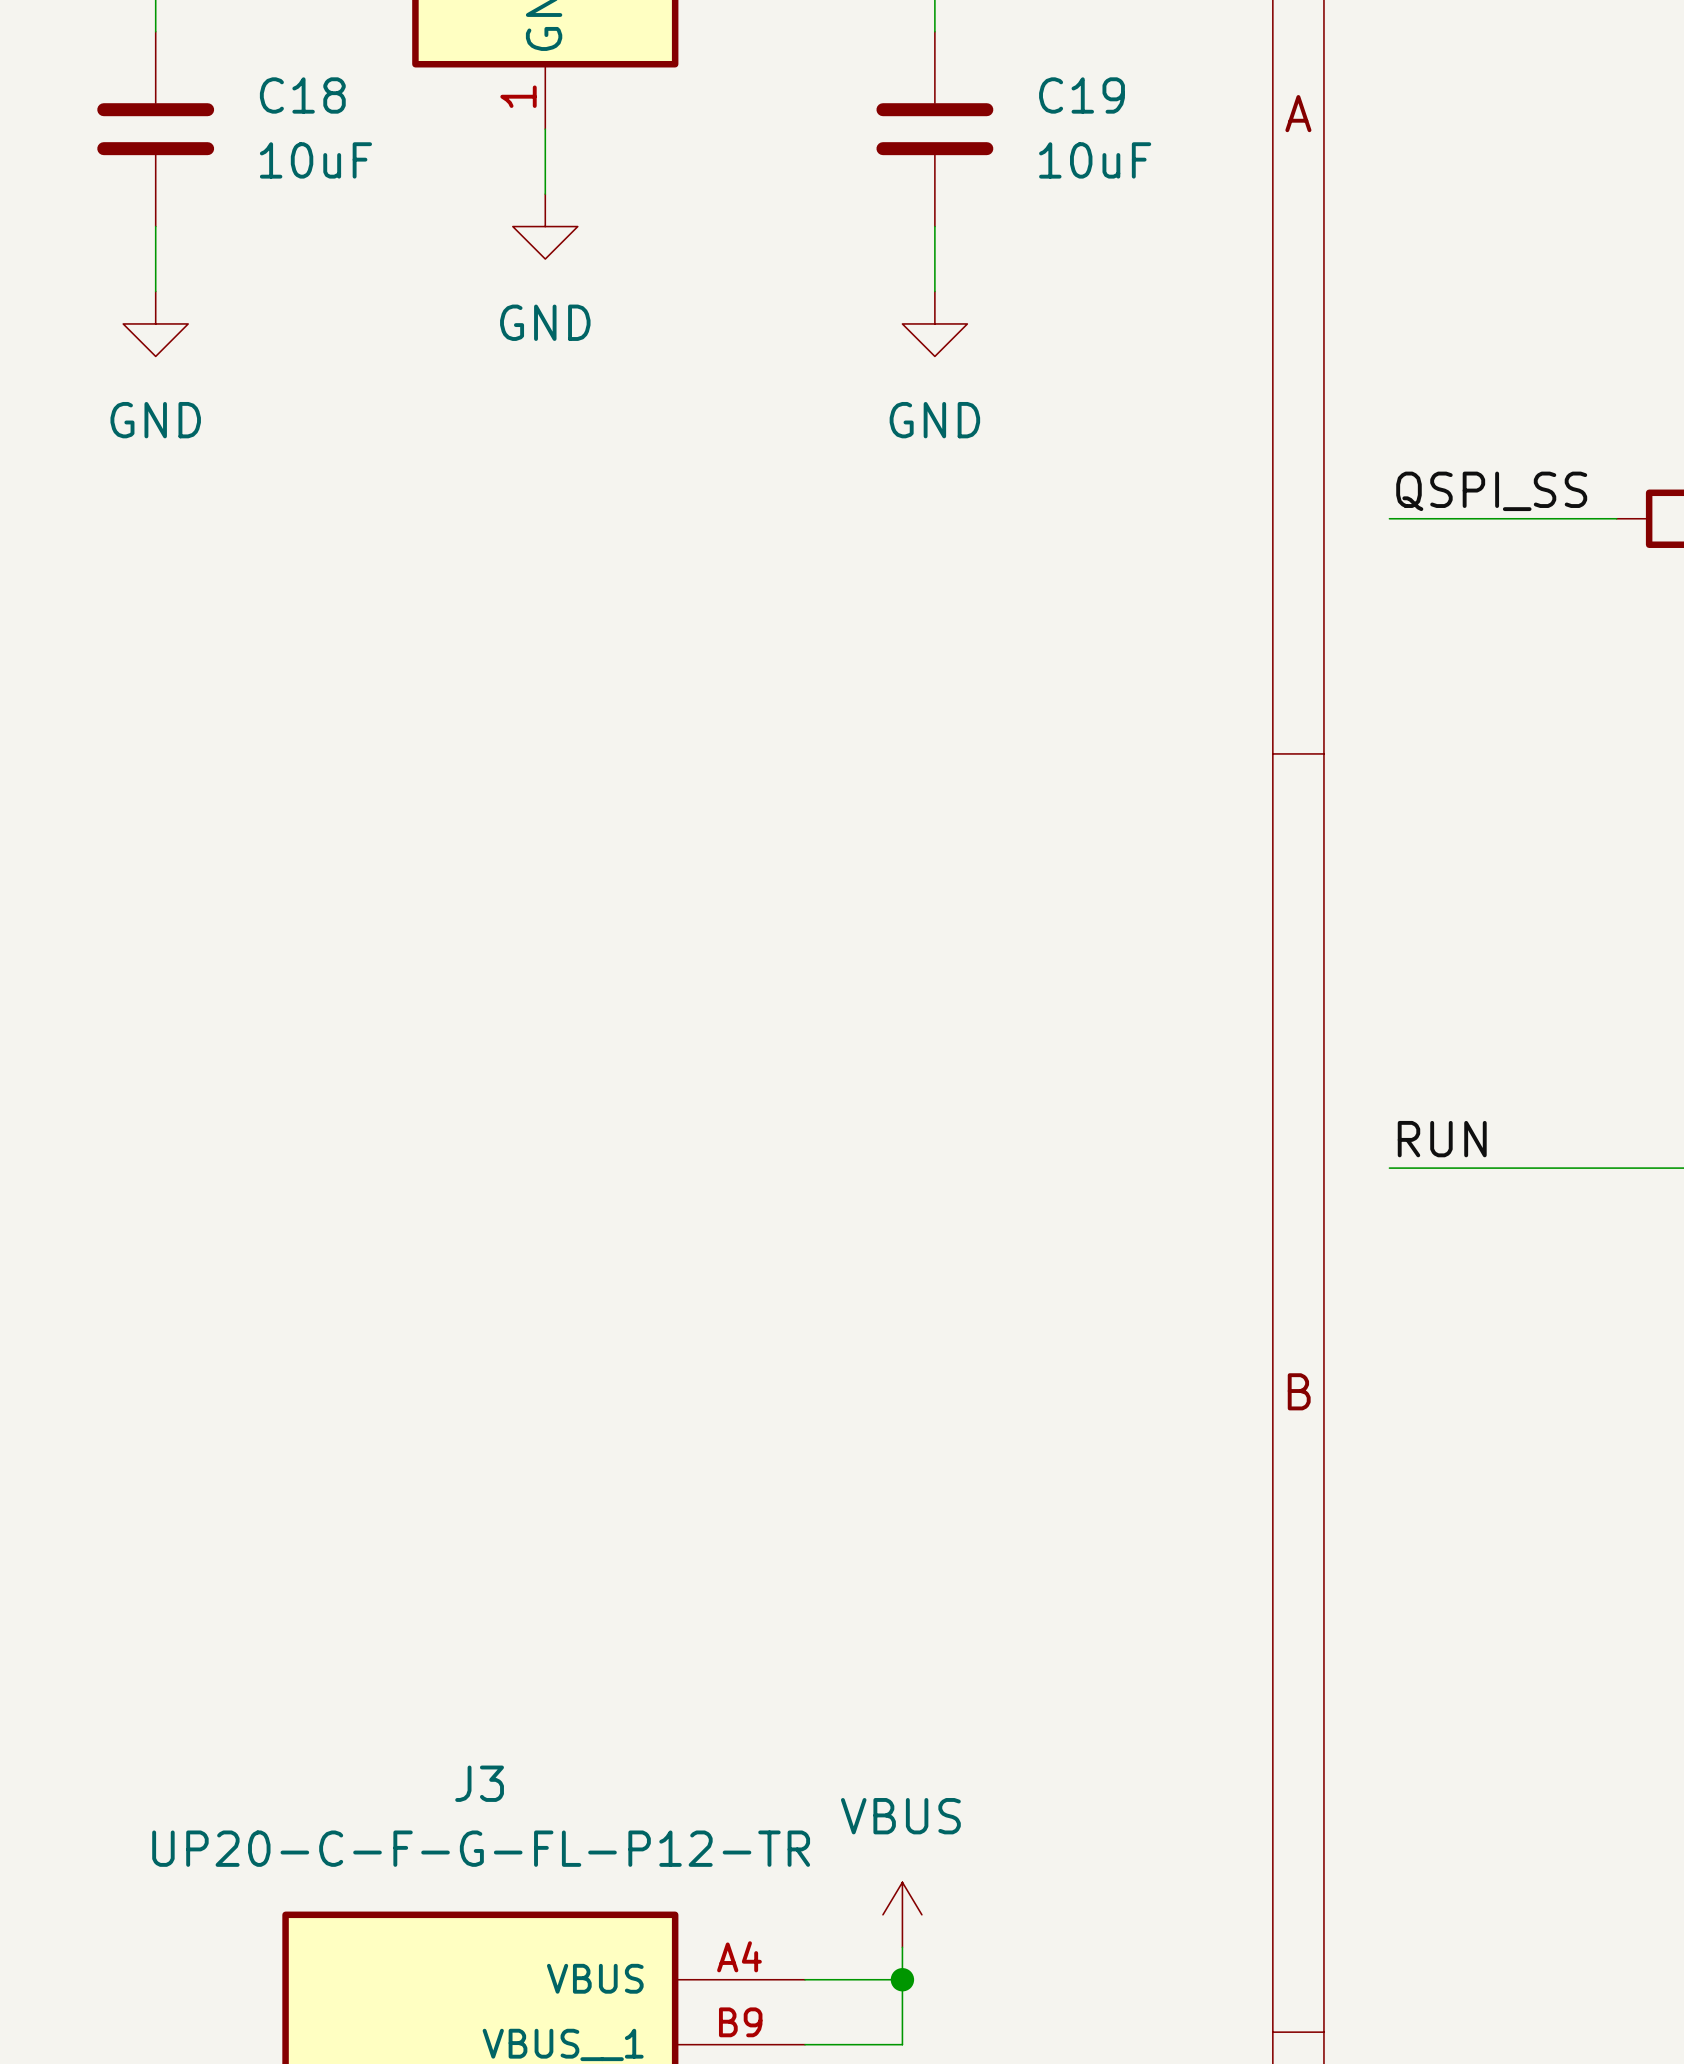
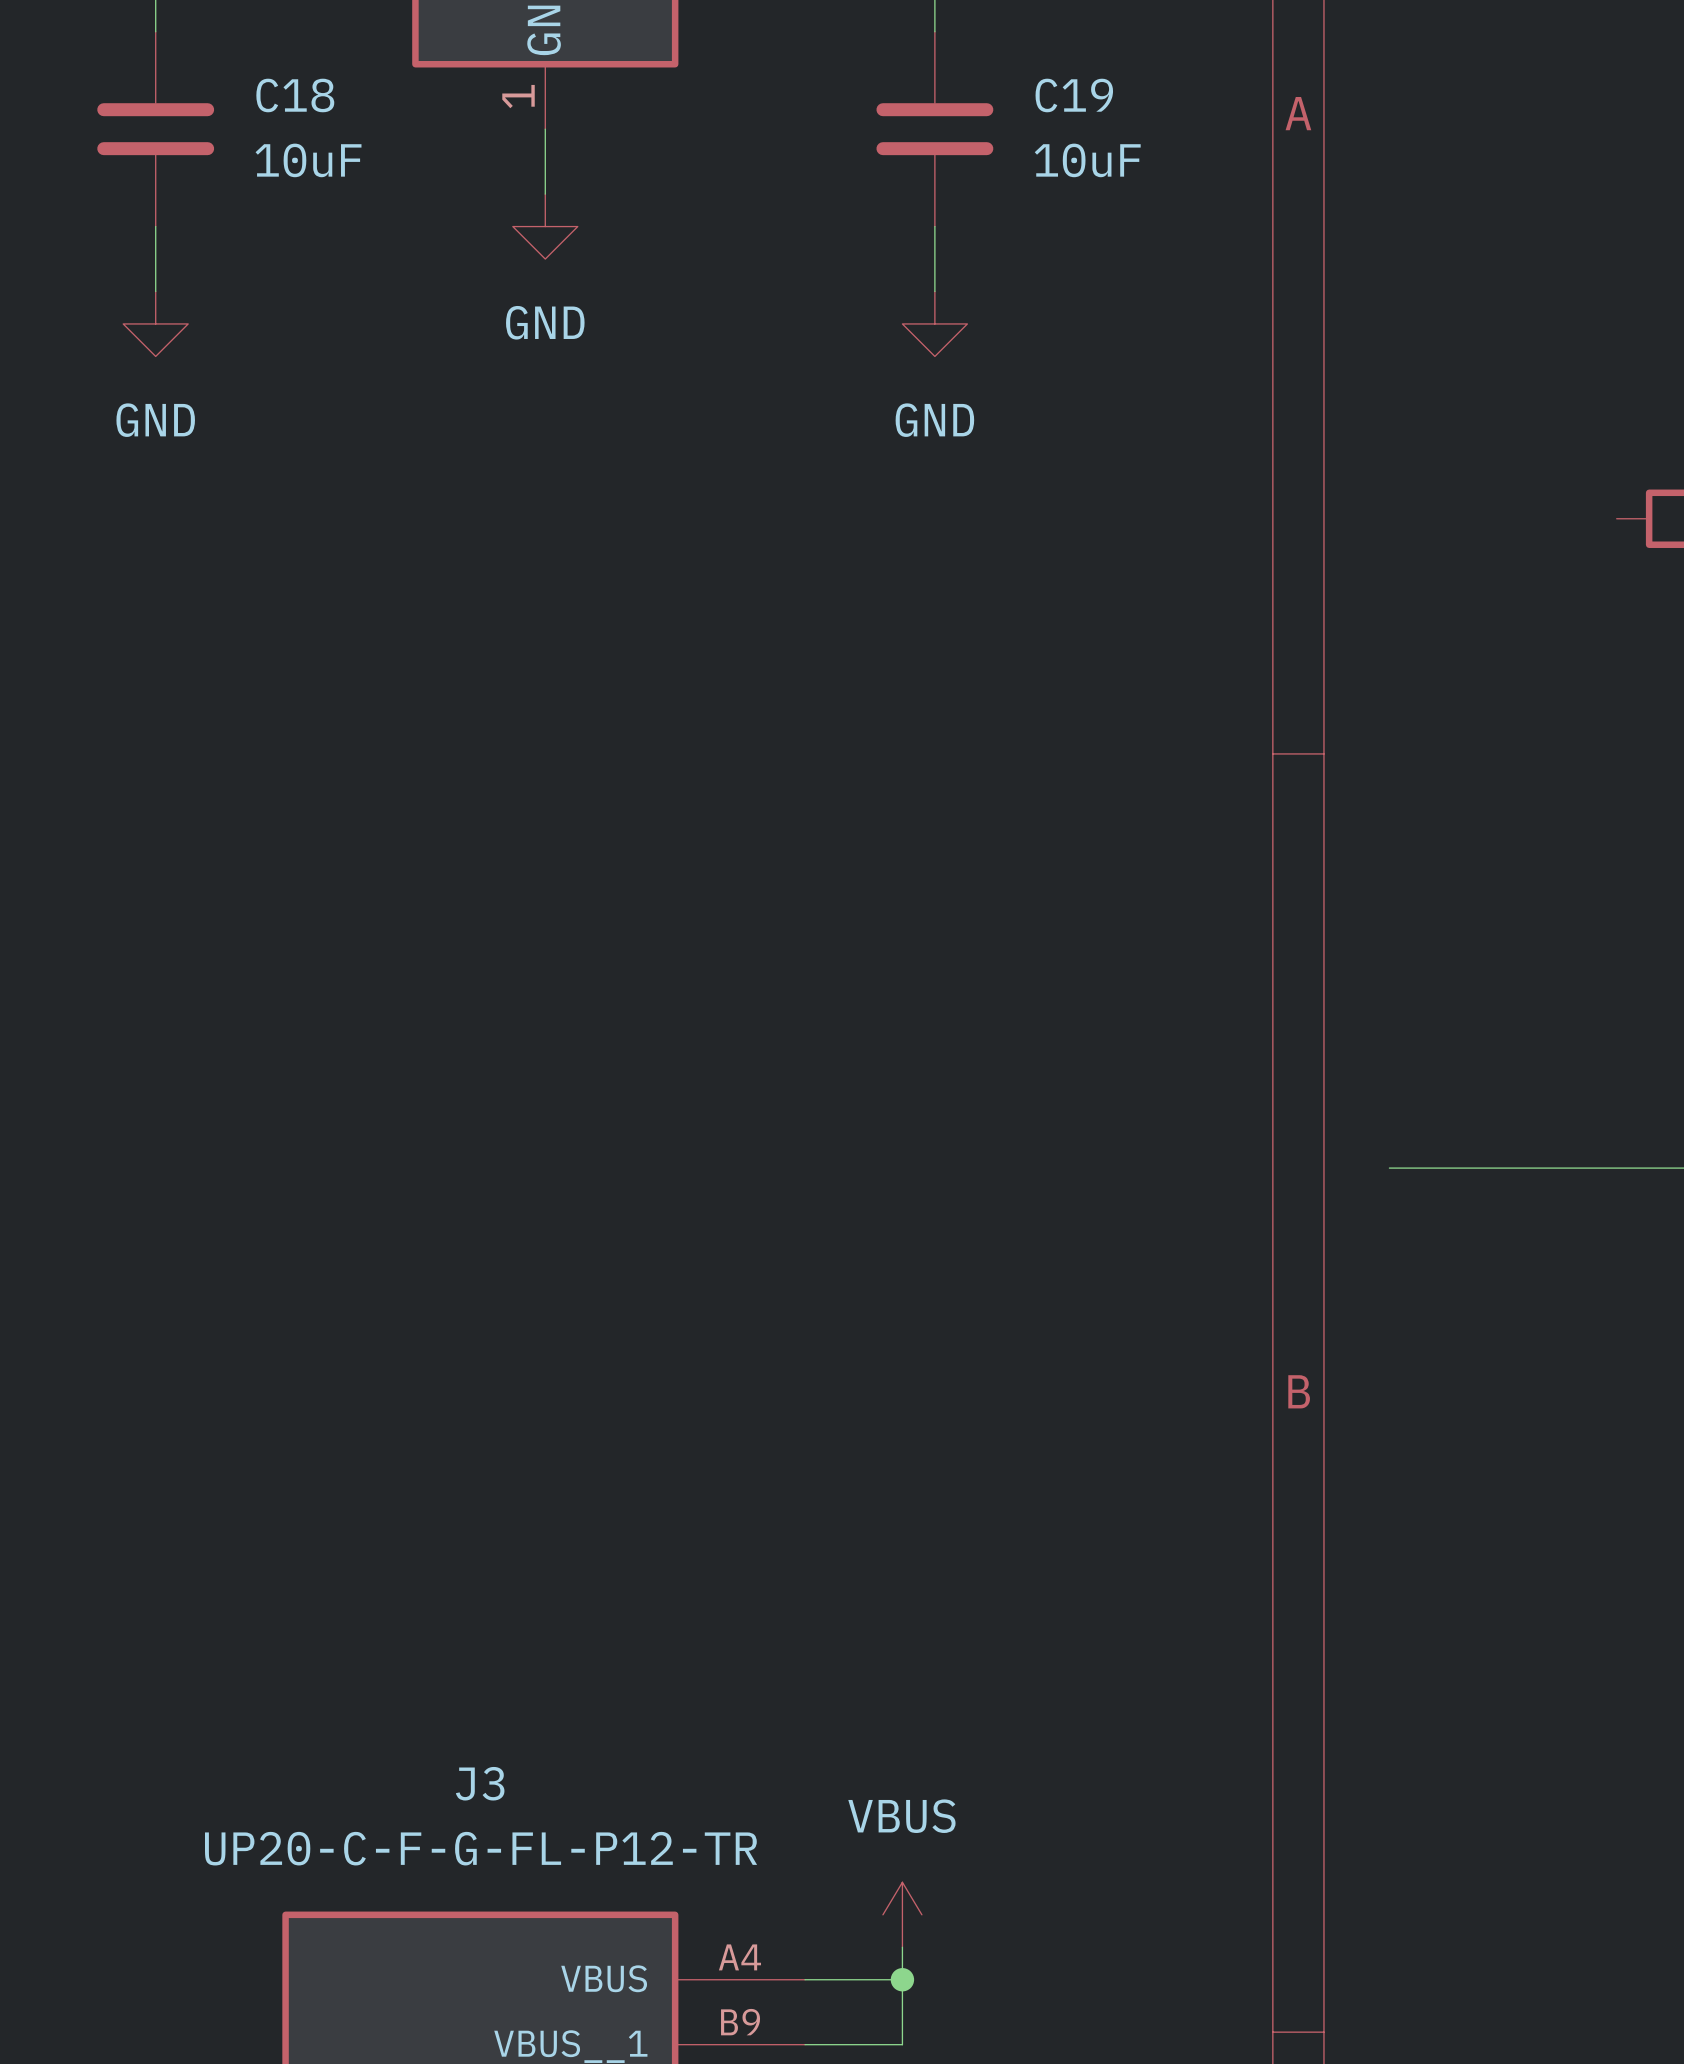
label: QSPI_SS (1491, 491) -> none
wire: (1389, 518) (1616, 518) -> none
label: RUN (1442, 1139) -> none

